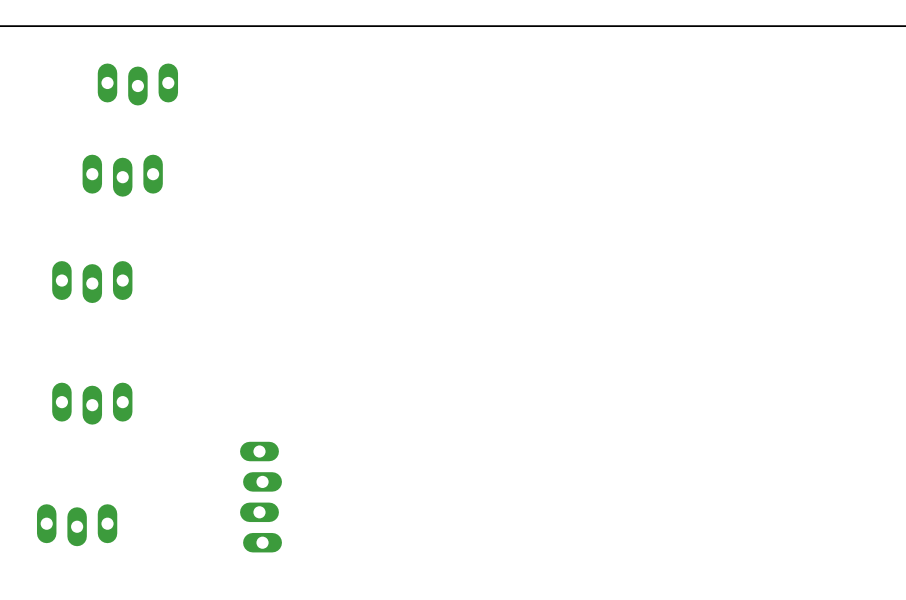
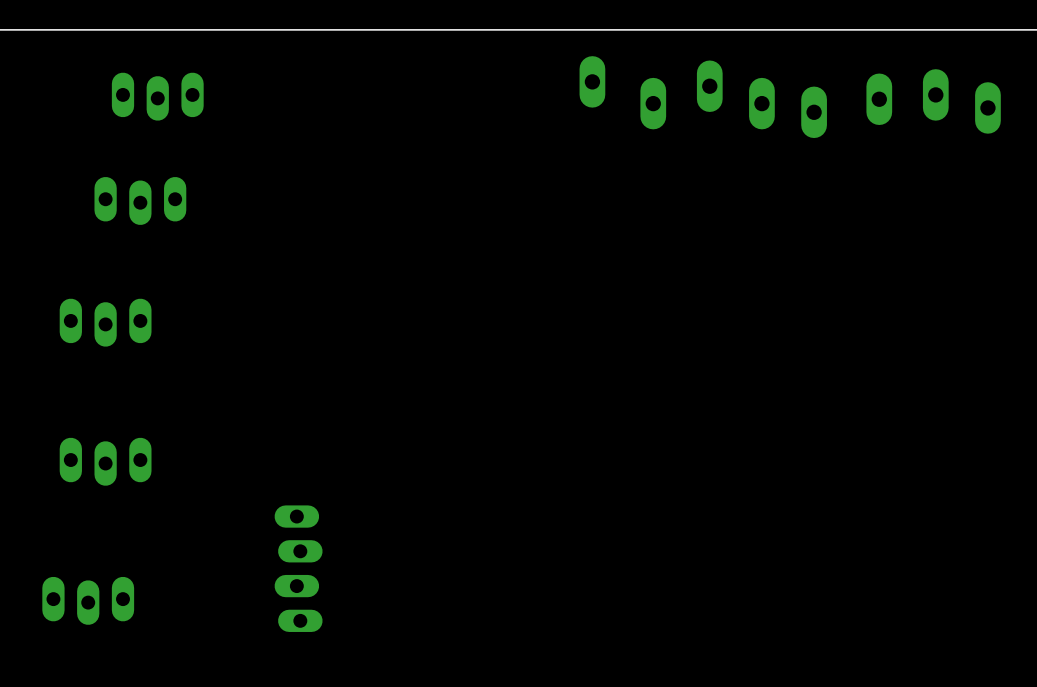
part: none -> (592, 81)
part: none -> (709, 86)
part: none -> (935, 94)
part: none -> (879, 99)
part: none -> (653, 103)
part: none -> (761, 103)
part: none -> (987, 107)
part: none -> (814, 112)

